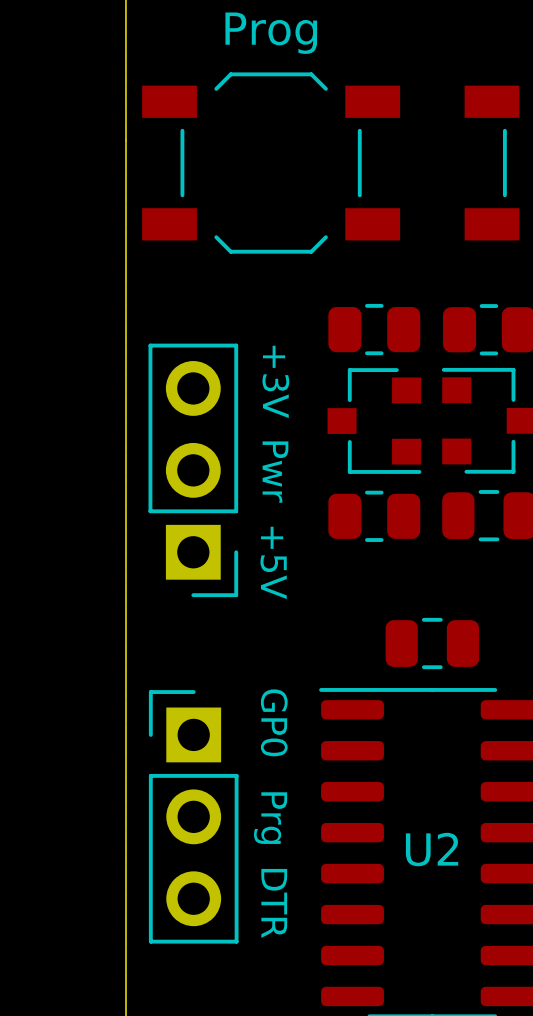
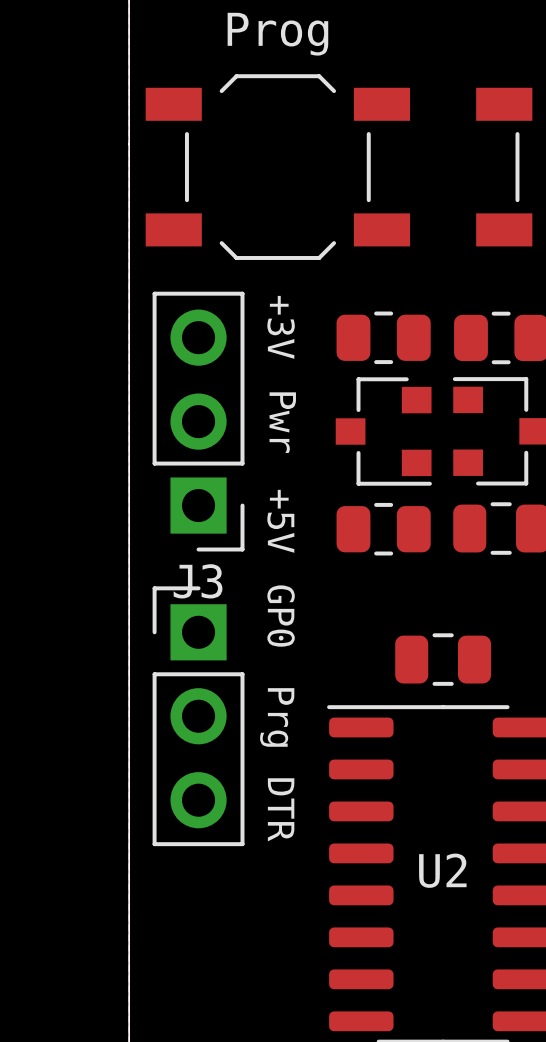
text position: +3V (275, 381) -> +3V (281, 327)
J3: none -> (198, 421)
part: (193, 470) -> none
text position: Pwr (275, 472) -> Pwr (282, 422)
text position: +5V (273, 562) -> +5V (280, 521)
text: none -> GP0 (281, 616)
part: none -> (198, 716)
text: GP0 (274, 722) -> Prg (277, 717)
part: (193, 816) -> none
text: Prg (270, 818) -> DTR (281, 809)
text: DTR (274, 903) -> none

